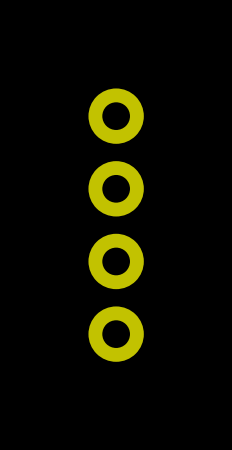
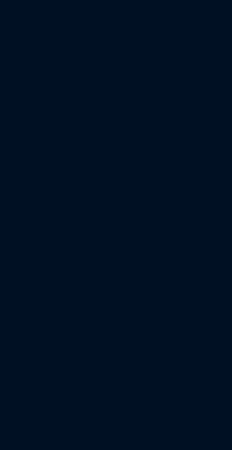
part: (116, 225) -> none

